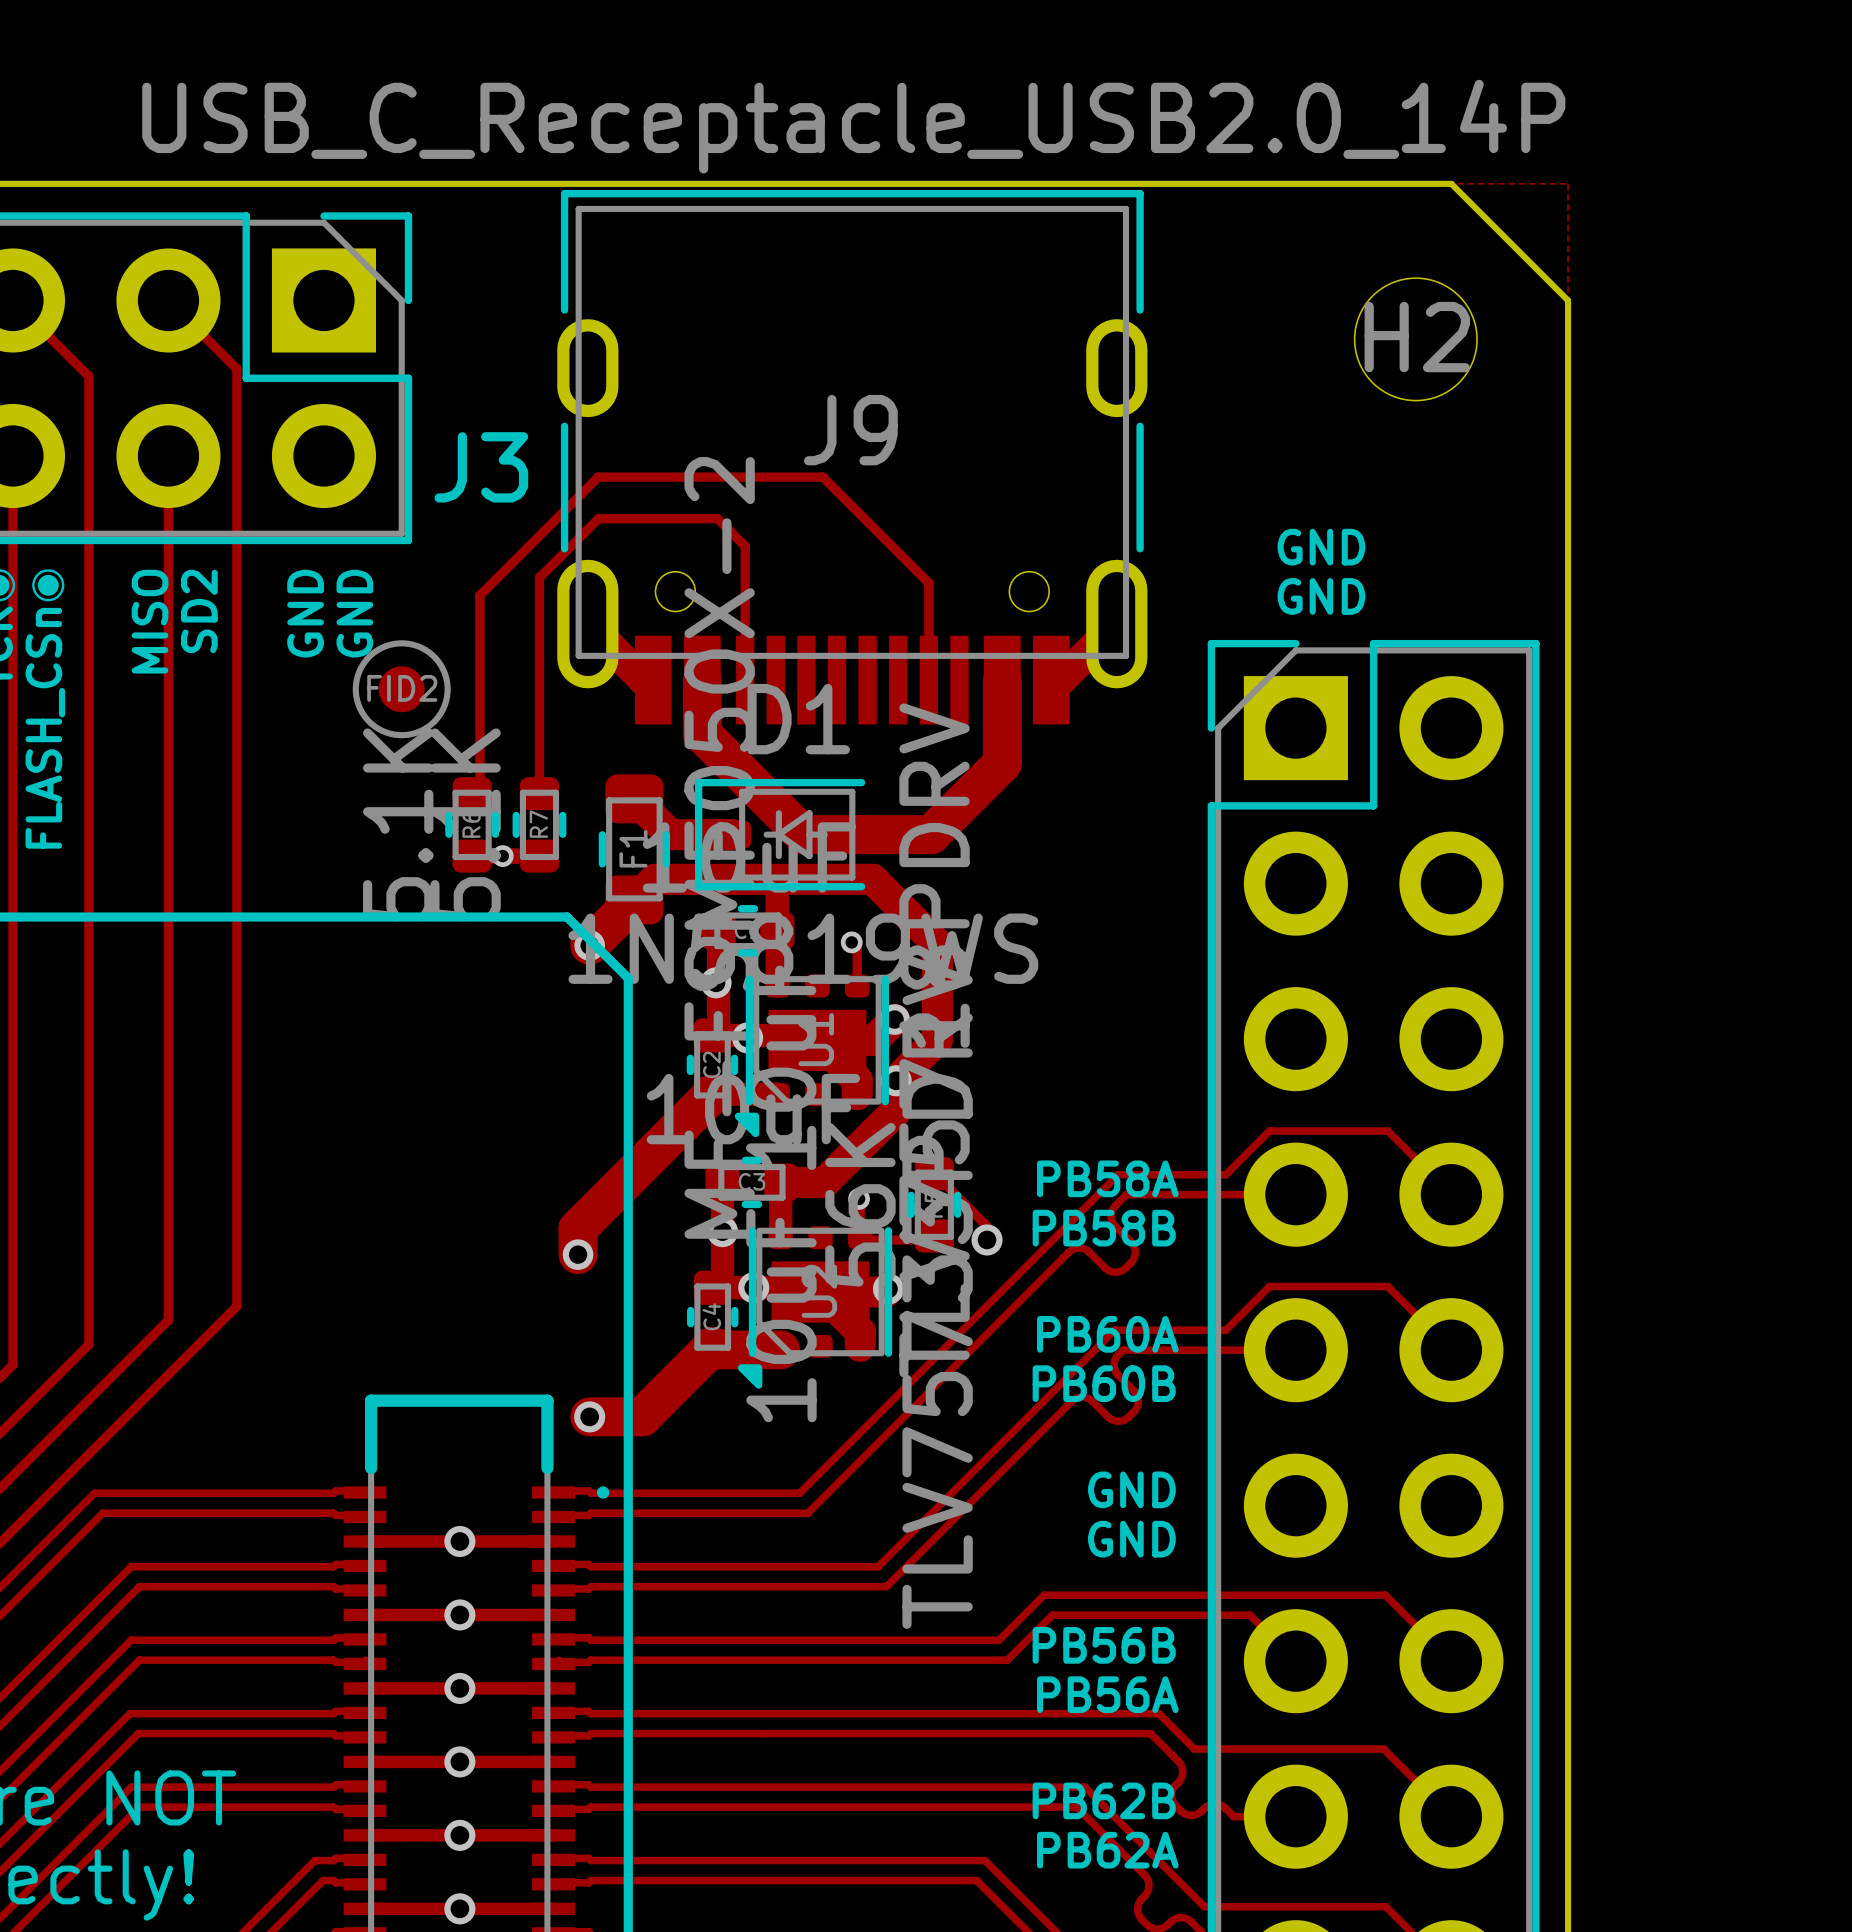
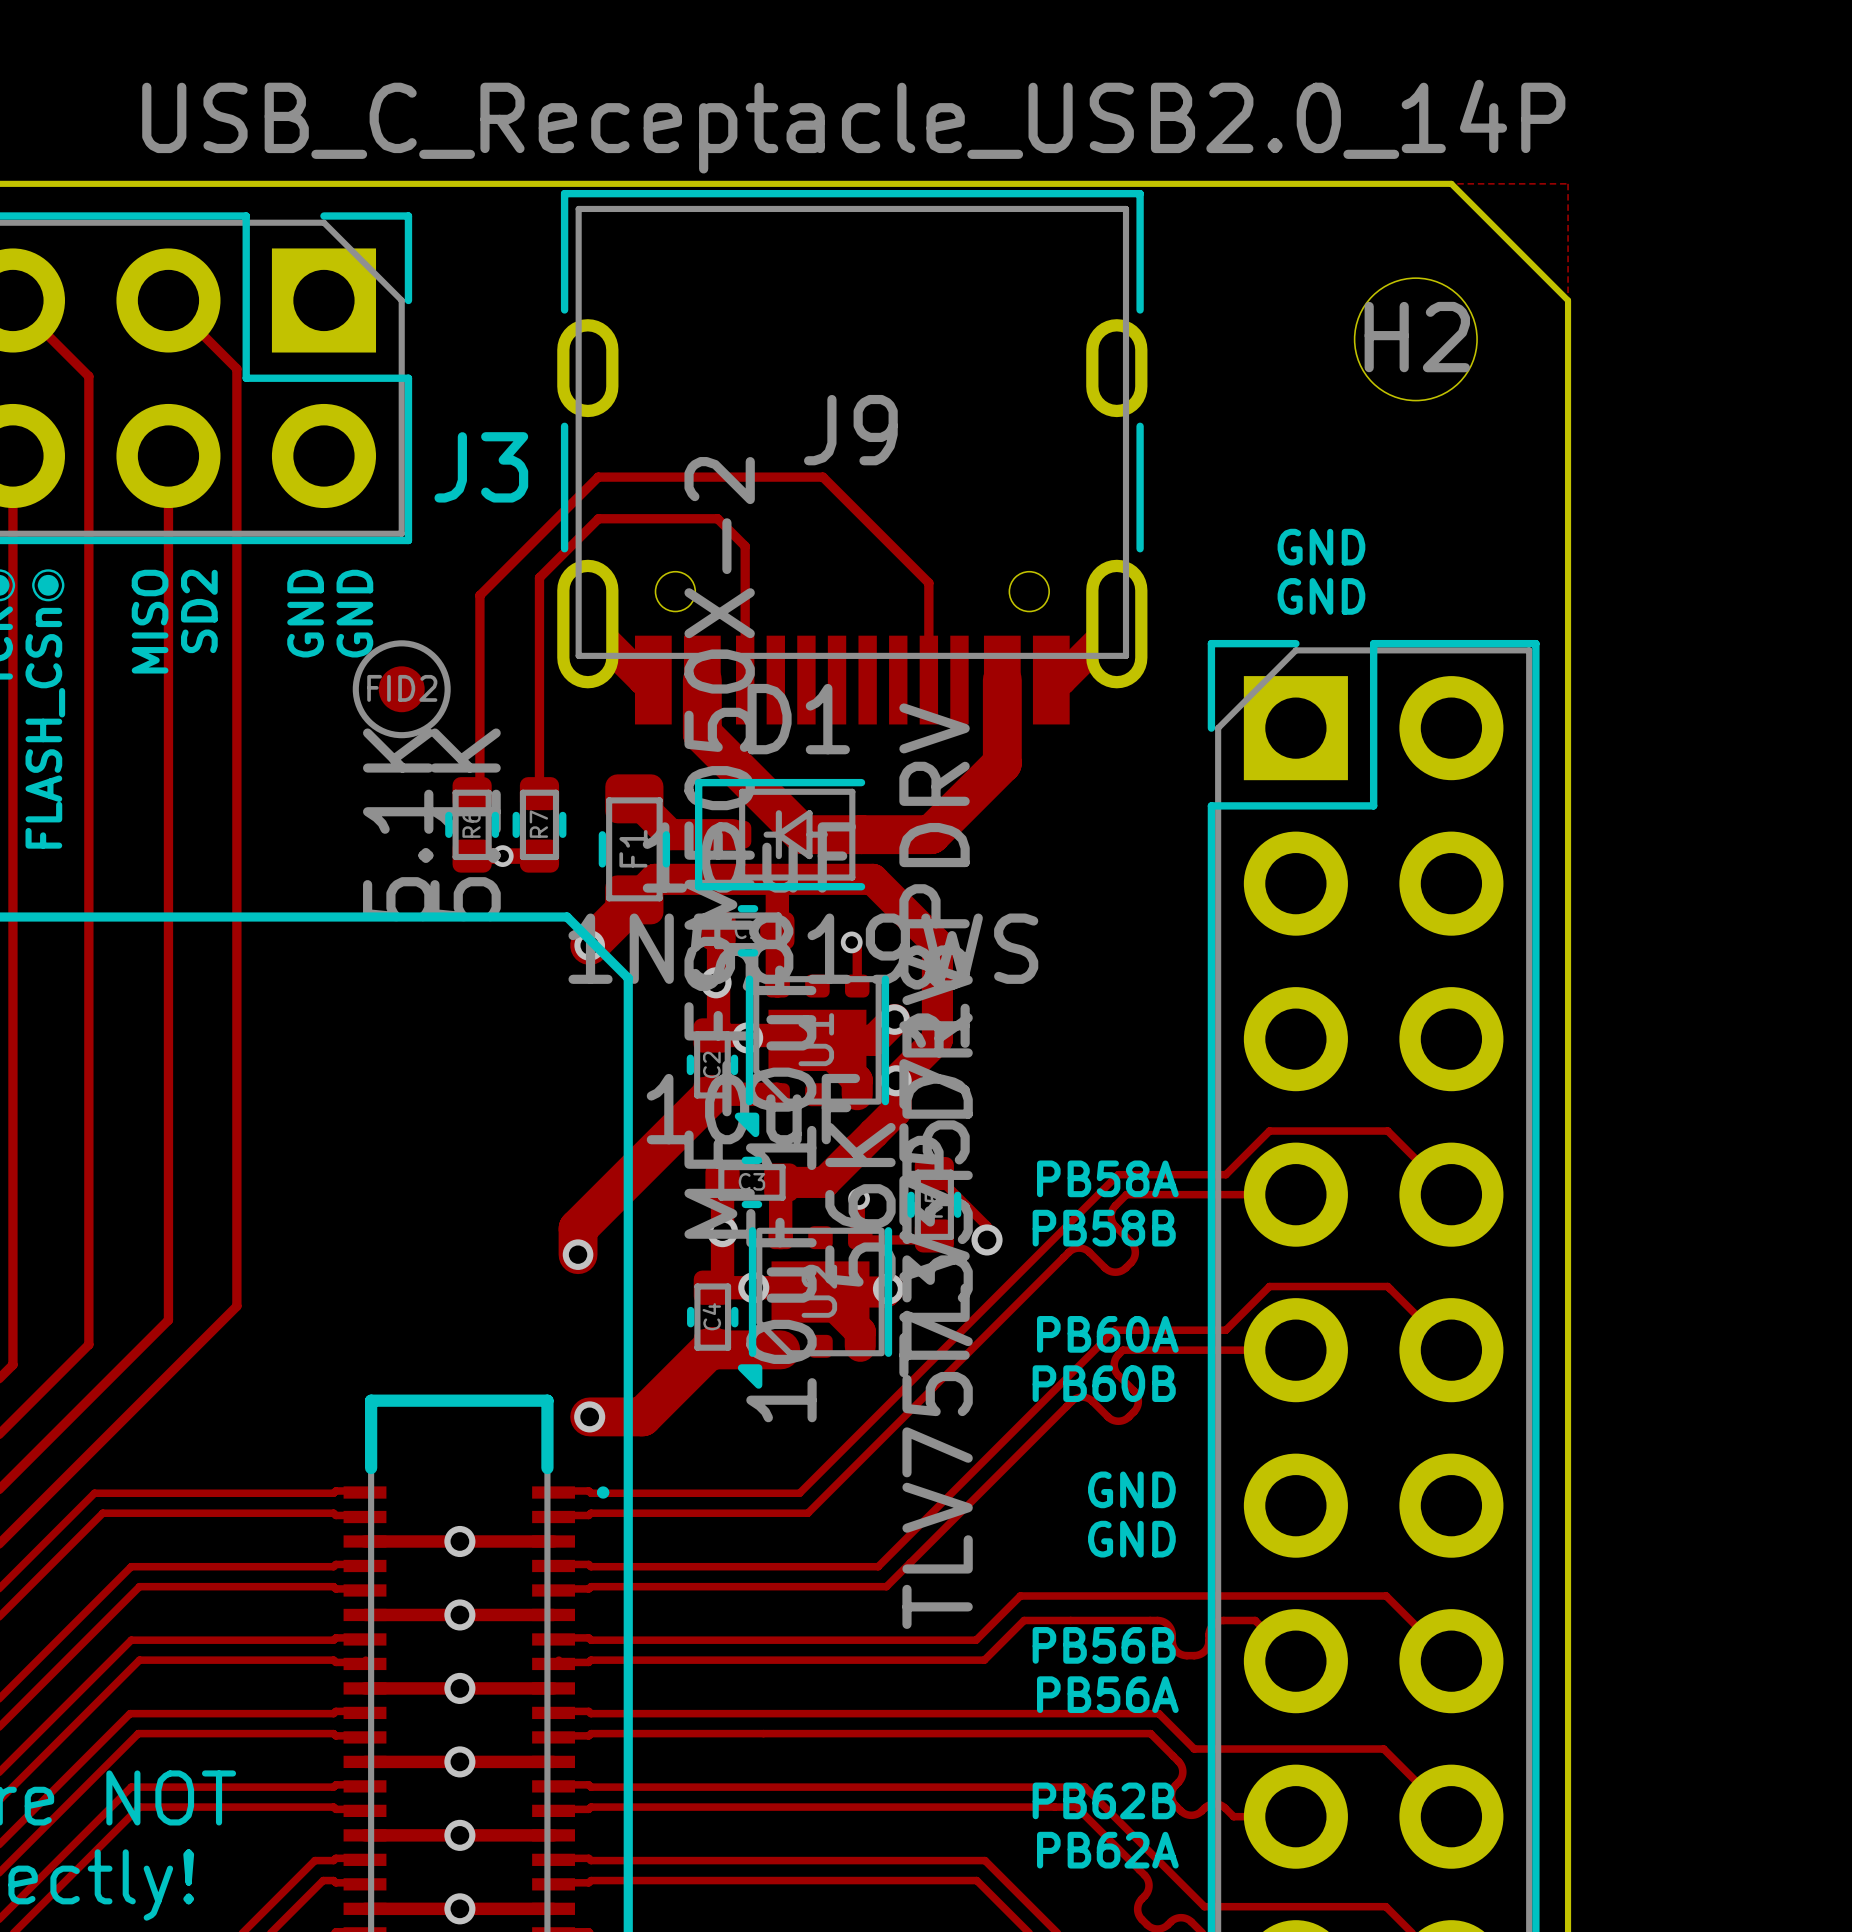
track: (1385, 1595) (1044, 1595) (999, 1640) (976, 1640) -> (1386, 1595) (1020, 1595) (976, 1640)
track: (1255, 1620) (1249, 1615) (1052, 1615) (1007, 1660) (984, 1660) -> (1255, 1620) (1222, 1620) (1215, 1622) (1209, 1630) (1206, 1648) (1200, 1654) (1194, 1655) (1183, 1655) (1176, 1651) (1172, 1644) (1170, 1628) (1160, 1620) (1024, 1620) (984, 1660)

